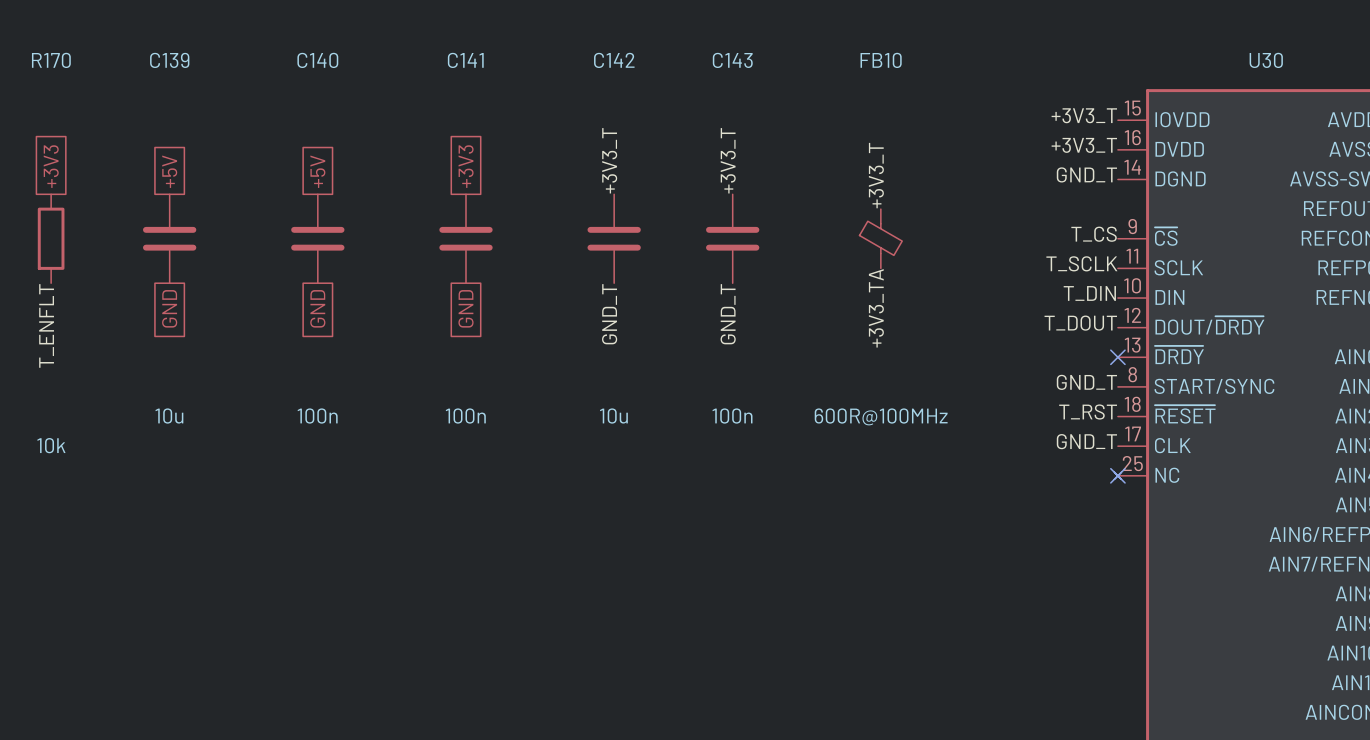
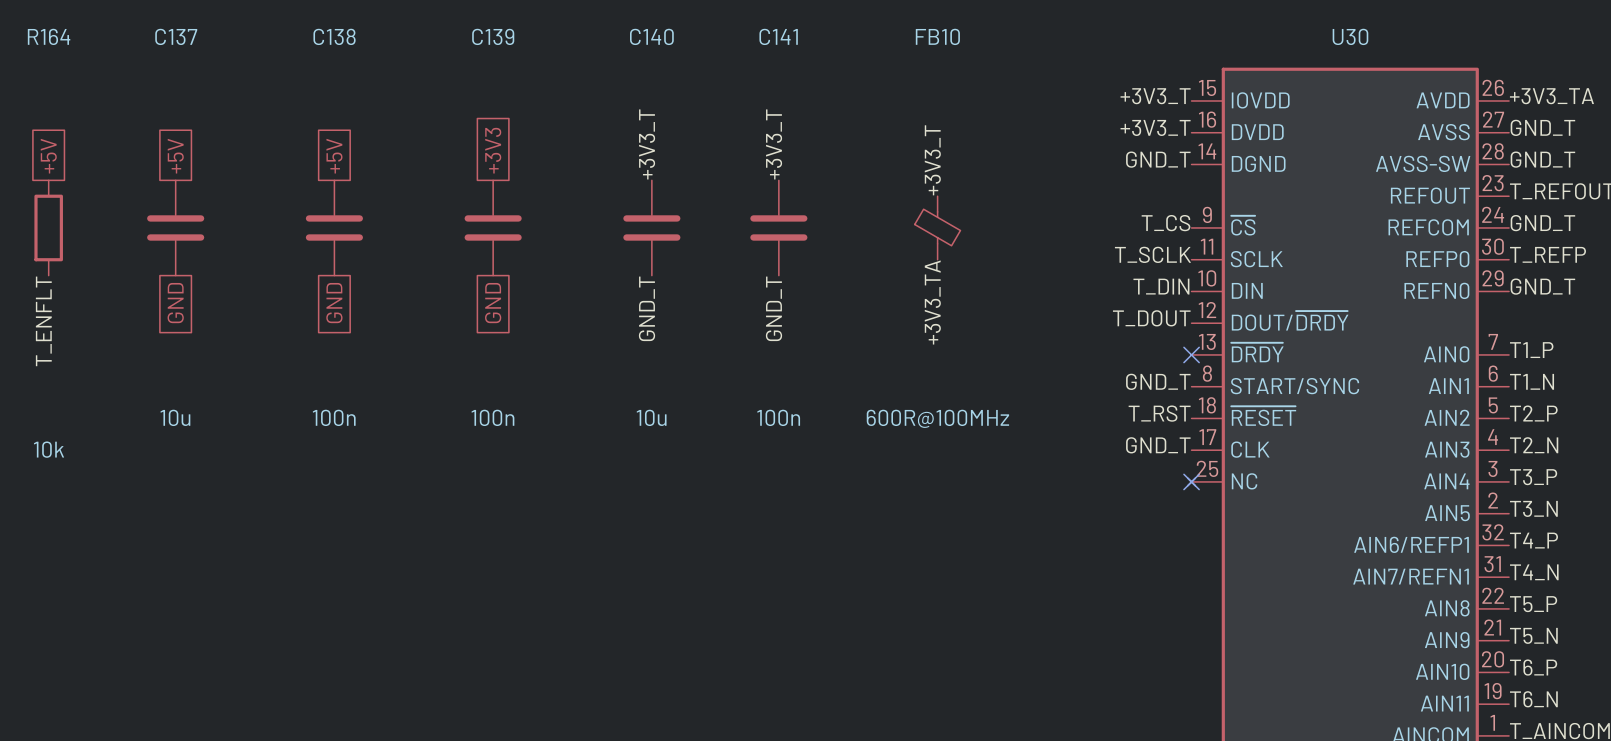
R170 name: R170 (51, 60) -> R164 (49, 36)
C139 name: C139 (169, 60) -> C137 (176, 36)
C140 name: C140 (317, 60) -> C138 (334, 36)
C141 name: C141 (465, 60) -> C139 (493, 36)
C142 name: C142 (614, 60) -> C140 (651, 36)
C143 name: C143 (732, 60) -> C141 (778, 36)
global label: +3V3 (51, 166) -> +5V (48, 156)

